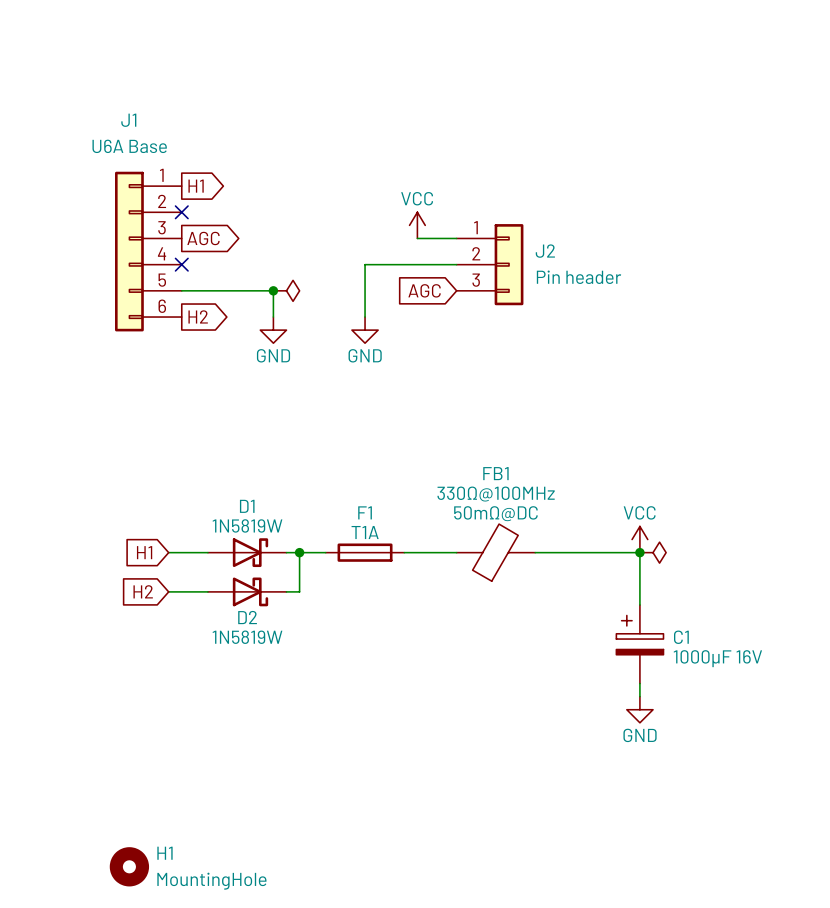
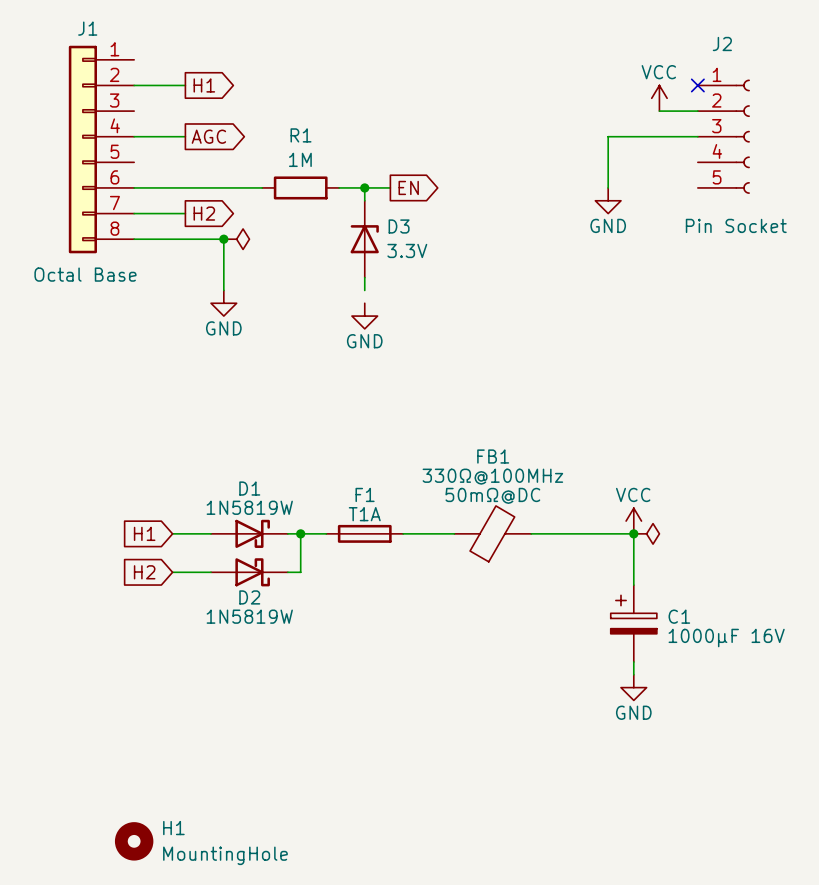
wire: none -> (134, 85) (185, 85)
no-connect mark: none -> (697, 85)
power symbol: none -> VCC (659, 98)
wire: none -> (659, 111) (697, 111)
wire: none -> (134, 136) (185, 136)
J1 value: U6A Base (129, 146) -> Octal Base (85, 274)
wire: none -> (697, 136) (608, 136) (608, 187)
J1 symbol: [115, 171, 182, 332] -> [68, 45, 135, 254]
global label position: H1 (196, 186) -> H1 (204, 85)
wire: none -> (134, 187) (262, 187)
R1: none -> 1M (300, 187)
wire: none -> (339, 187) (390, 187)
junction: none -> (364, 187)
global label: none -> EN (408, 187)
no-connect mark: (181, 212) -> none
power symbol: none -> GND (608, 200)
J2 symbol: [456, 224, 524, 306] -> [697, 79, 750, 194]
wire: none -> (134, 213) (185, 213)
power symbol: VCC (417, 225) -> none
global label position: AGC (203, 238) -> AGC (208, 136)
wire: (417, 238) (456, 238) -> none
wire: none -> (134, 239) (223, 239) (223, 290)
junction: none -> (223, 239)
D3: none -> 3.3V (364, 239)
J2 name position: J2 (545, 251) -> J2 (722, 43)
no-connect mark: (181, 264) -> none
wire: (456, 264) (365, 264) (365, 290) -> none
J2 value: Pin header (579, 277) -> Pin Socket (736, 225)
wire: (181, 290) (273, 290) (273, 317) -> none
junction: (273, 290) -> none
power symbol position: (286, 290) -> (236, 239)
global label: AGC (424, 290) -> none
wire: (365, 303) (365, 317) -> (364, 187) (364, 200)
global label position: H2 (198, 316) -> H2 (204, 213)
power symbol position: GND (273, 330) -> GND (223, 303)

